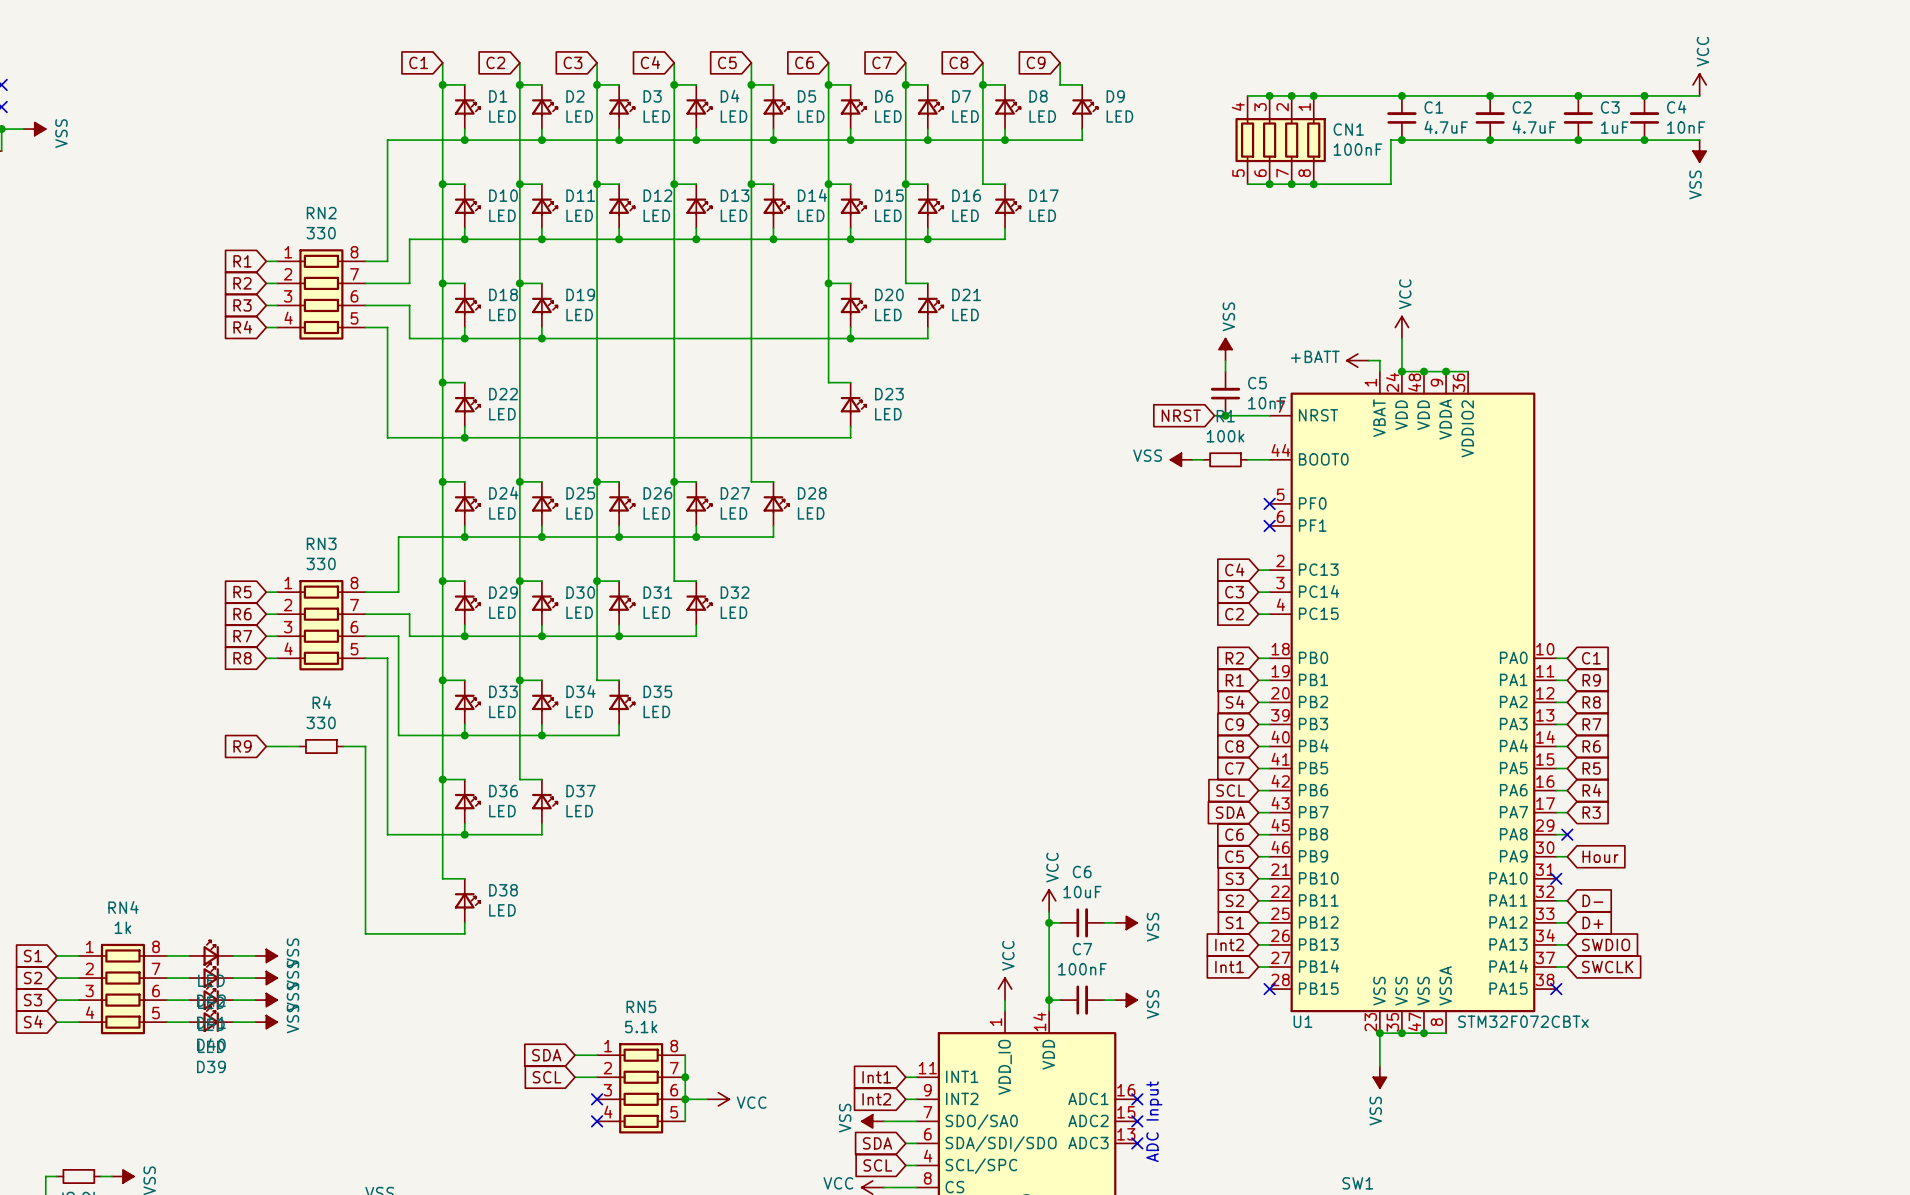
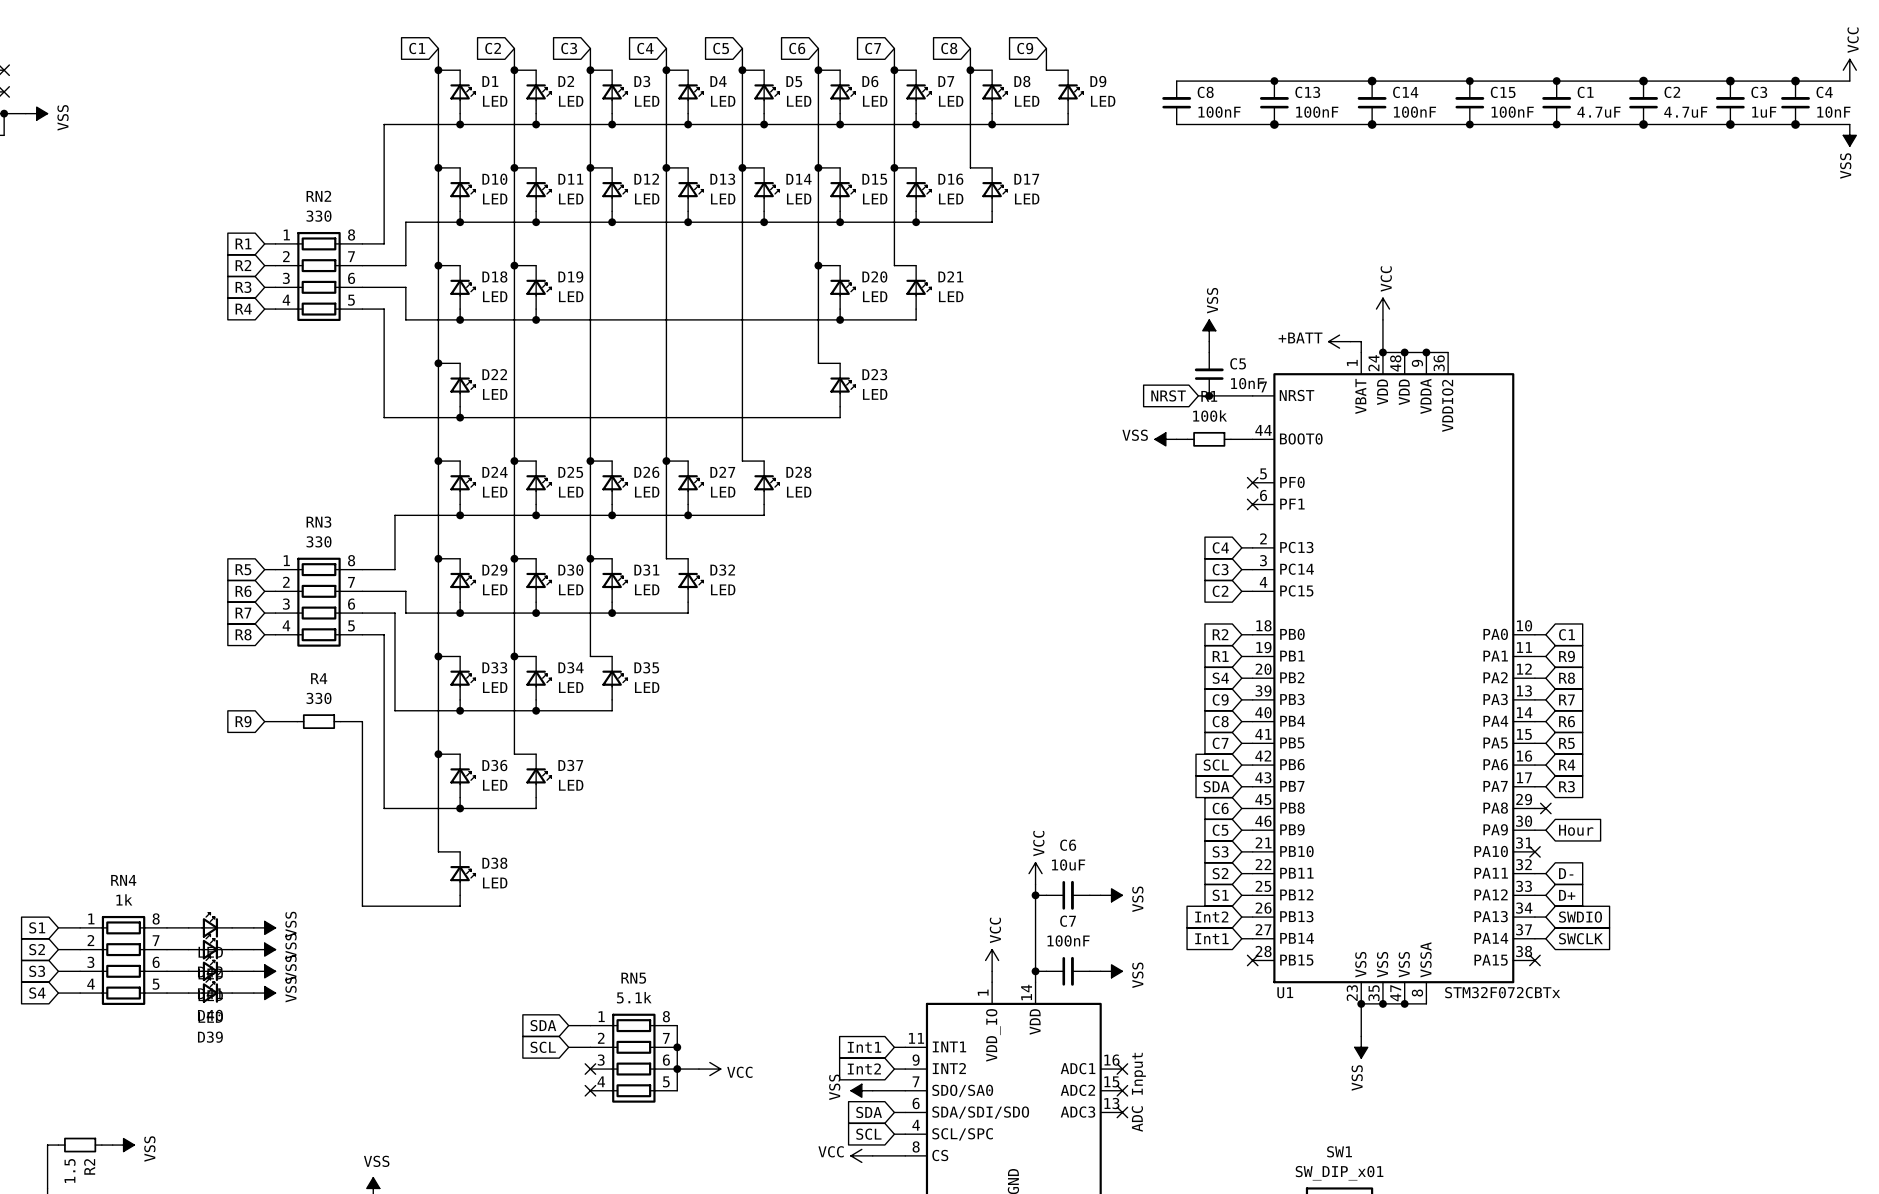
power symbol position: VCC (1699, 84) -> VCC (1849, 70)
wire: none -> (1176, 81) (1230, 81)
junction: (1269, 95) -> none
junction: (1313, 95) -> none
junction: none -> (1372, 81)
junction: (1401, 95) -> none
junction: (1644, 95) -> none
junction: none -> (1643, 81)
wire: none -> (1676, 81) (1849, 81)
junction: none -> (1730, 81)
junction: none -> (1795, 81)
C2 name: C2 (1522, 107) -> C15 (1503, 92)
C3 name: C3 (1610, 107) -> C1 (1585, 92)
C8: none -> 100nF (1176, 102)
C13: none -> 100nF (1274, 102)
C14: none -> 100nF (1372, 102)
C1: 4.7uF (1401, 118) -> none
C4 position: (1644, 118) -> (1795, 102)
C2: none -> 4.7uF (1643, 102)
C3: none -> 1uF (1730, 102)
C2 value: 4.7uF (1534, 127) -> 100nF (1512, 112)
C3 value: 1uF (1614, 127) -> 4.7uF (1598, 112)
CN1: 100nF (1280, 140) -> none
junction: none -> (1274, 124)
wire: (1390, 140) (1390, 184) (1247, 184) -> (1372, 124) (1176, 124)
junction: none -> (1372, 124)
junction: (1401, 140) -> none
junction: (1644, 140) -> none
junction: none -> (1643, 124)
wire: none -> (1676, 124) (1849, 124)
junction: none -> (1730, 124)
junction: none -> (1795, 124)
power symbol position: VSS (1699, 151) -> VSS (1849, 135)
junction: (1269, 184) -> none
junction: (1291, 184) -> none
junction: (1313, 184) -> none

